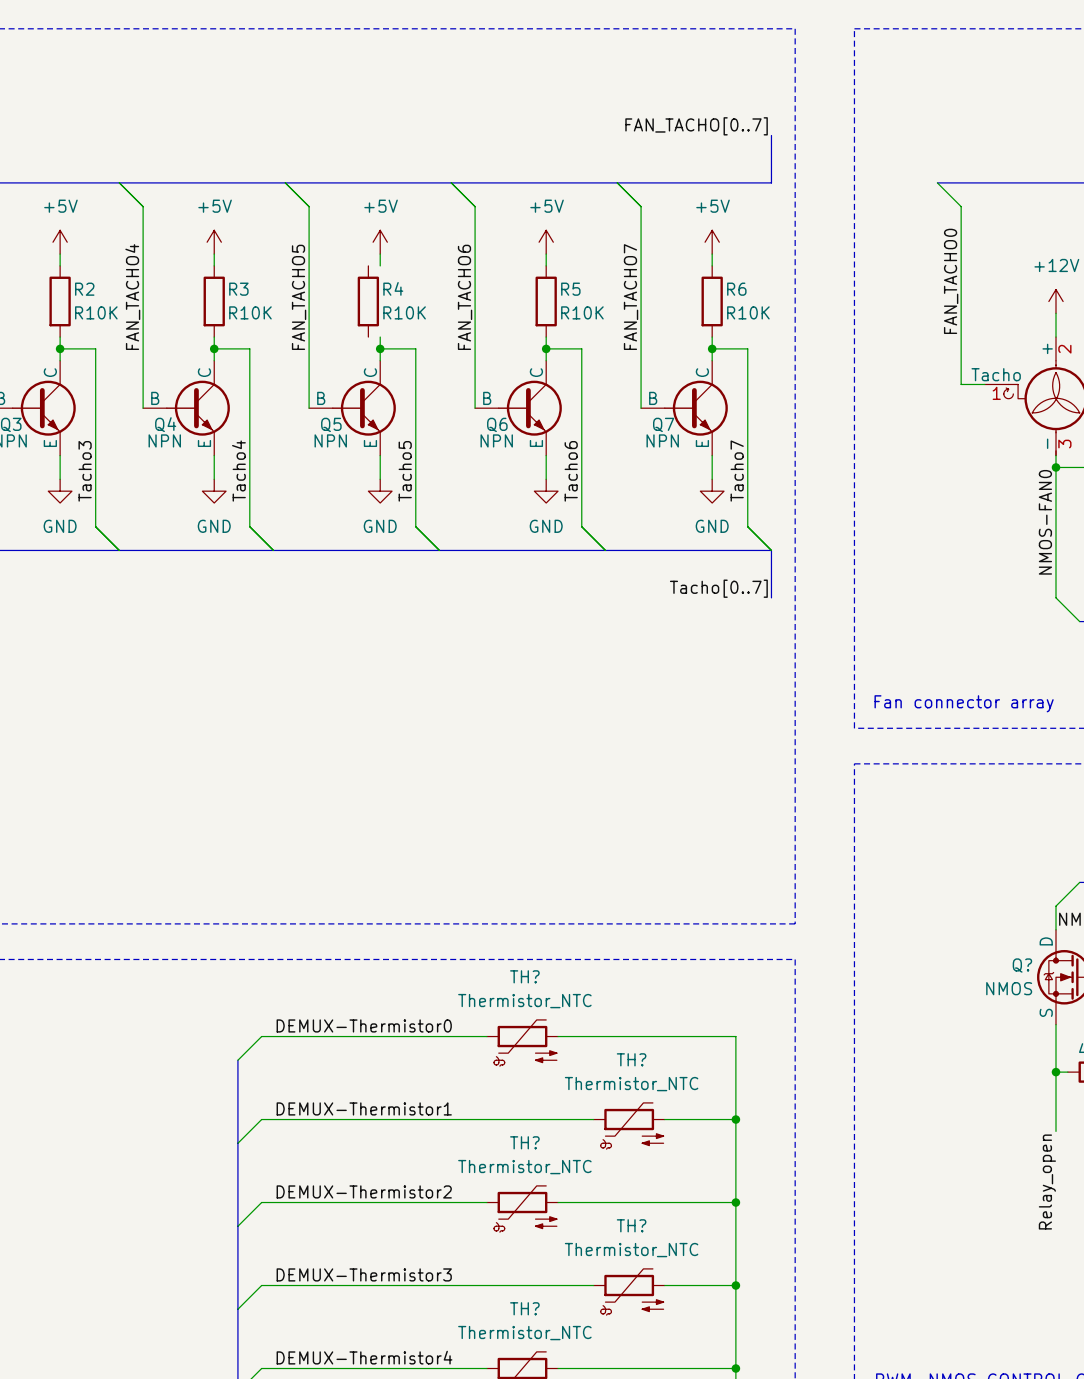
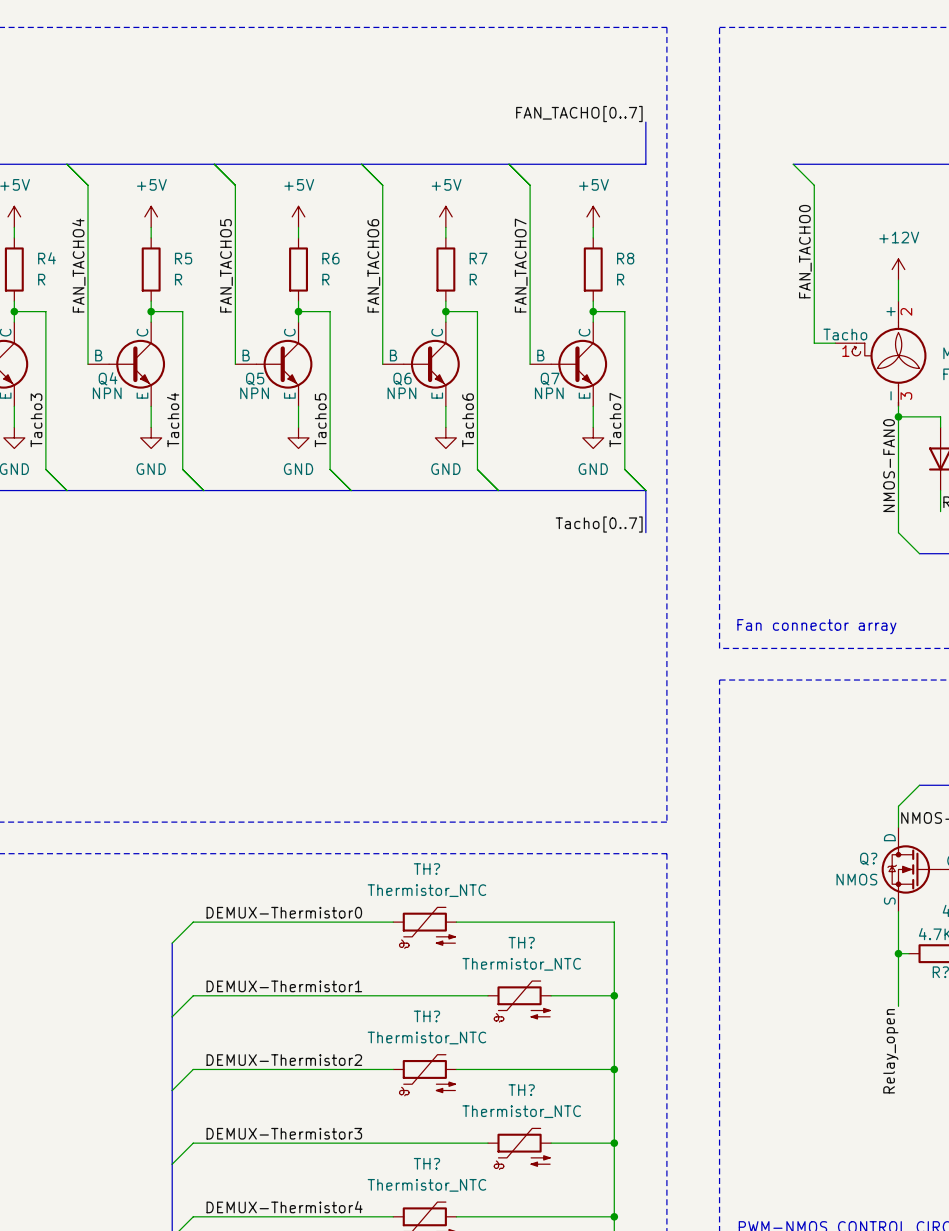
R2 name: R2 (84, 289) -> R4 (46, 258)
R3 name: R3 (238, 289) -> R5 (183, 258)
R5 name: R5 (570, 289) -> R7 (478, 258)
R6 name: R6 (736, 289) -> R8 (625, 258)
R4: R10K (368, 301) -> none
R6: none -> R (298, 269)
R2 value: R10K (96, 312) -> R (41, 279)
R3 value: R10K (250, 312) -> R (178, 279)
R5 value: R10K (582, 312) -> R (473, 279)
R6 value: R10K (748, 312) -> R (620, 279)

